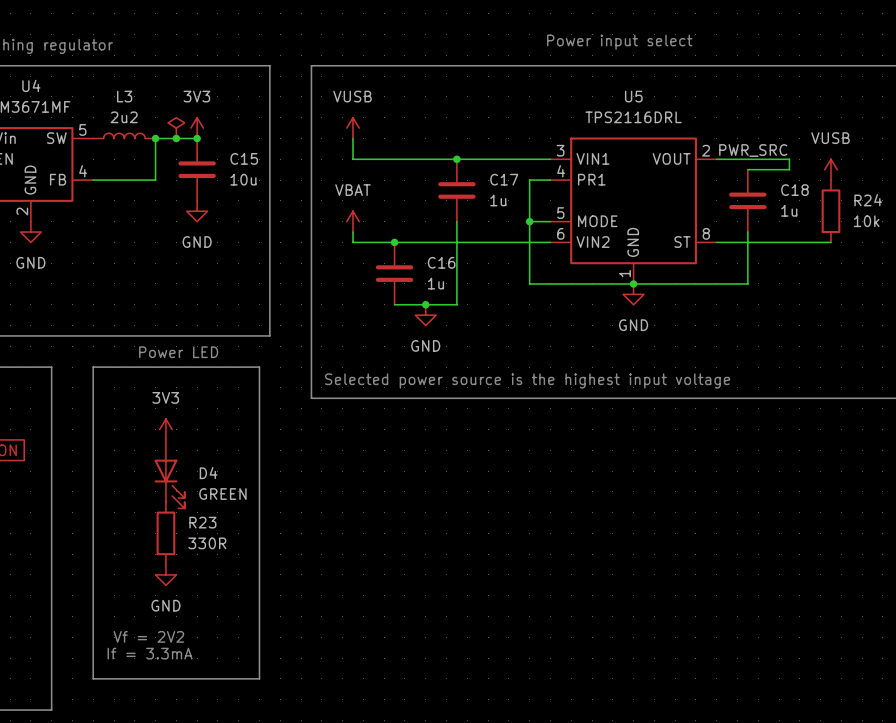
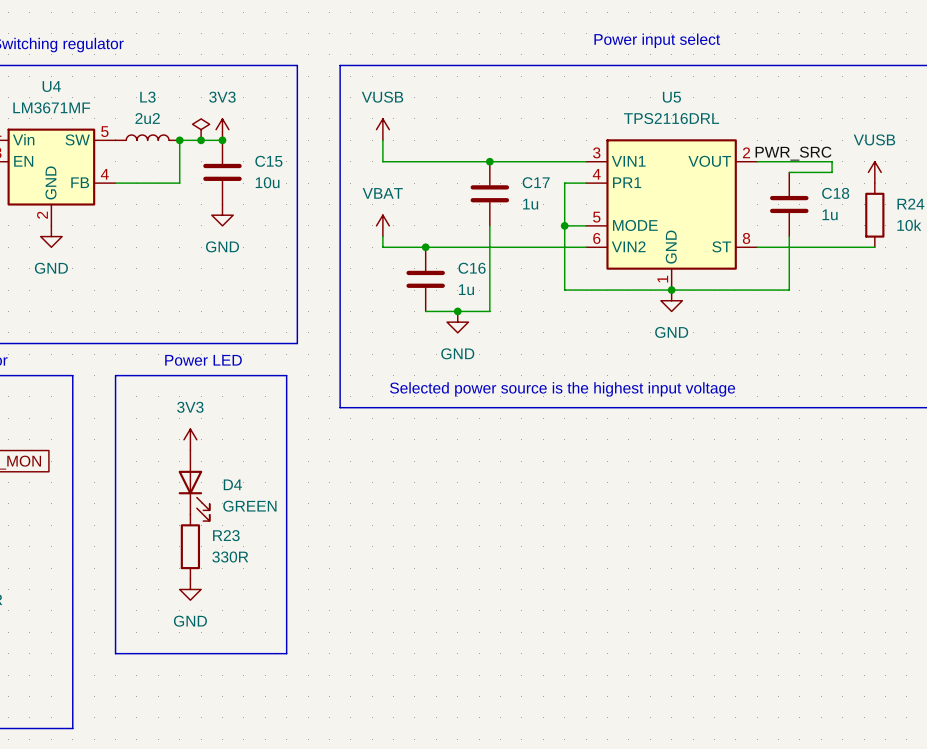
text: Vf = 2V2 (148, 636) -> none
line: (93, 637) (93, 678) (259, 678) (259, 637) -> (115, 653) (286, 653)
text: If = 3.3mA (150, 653) -> none

